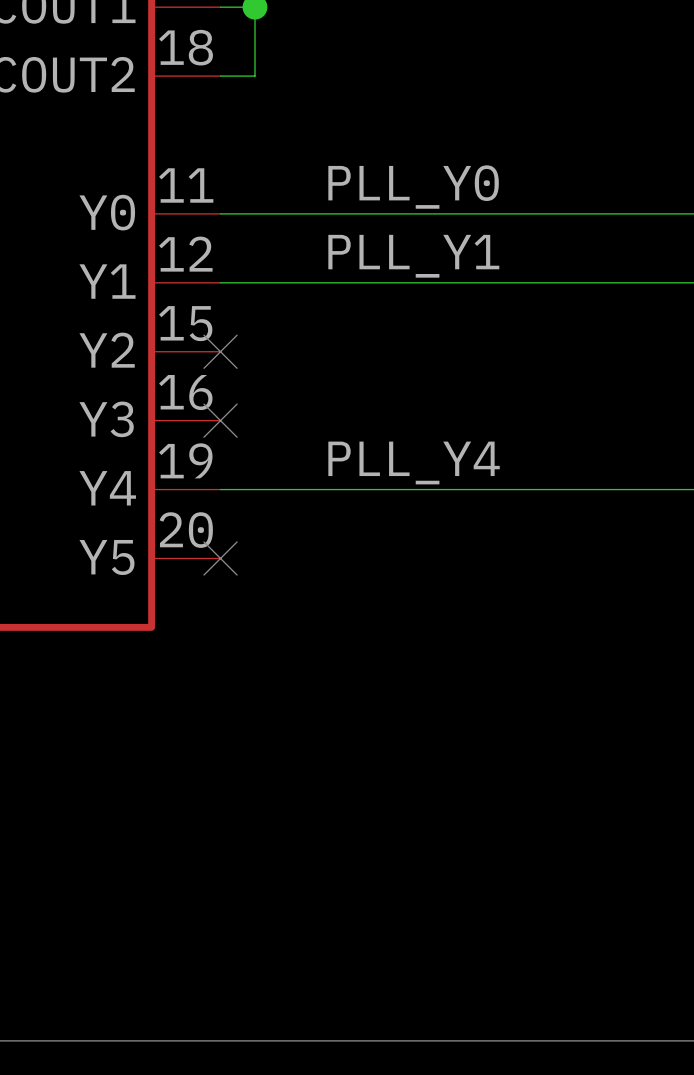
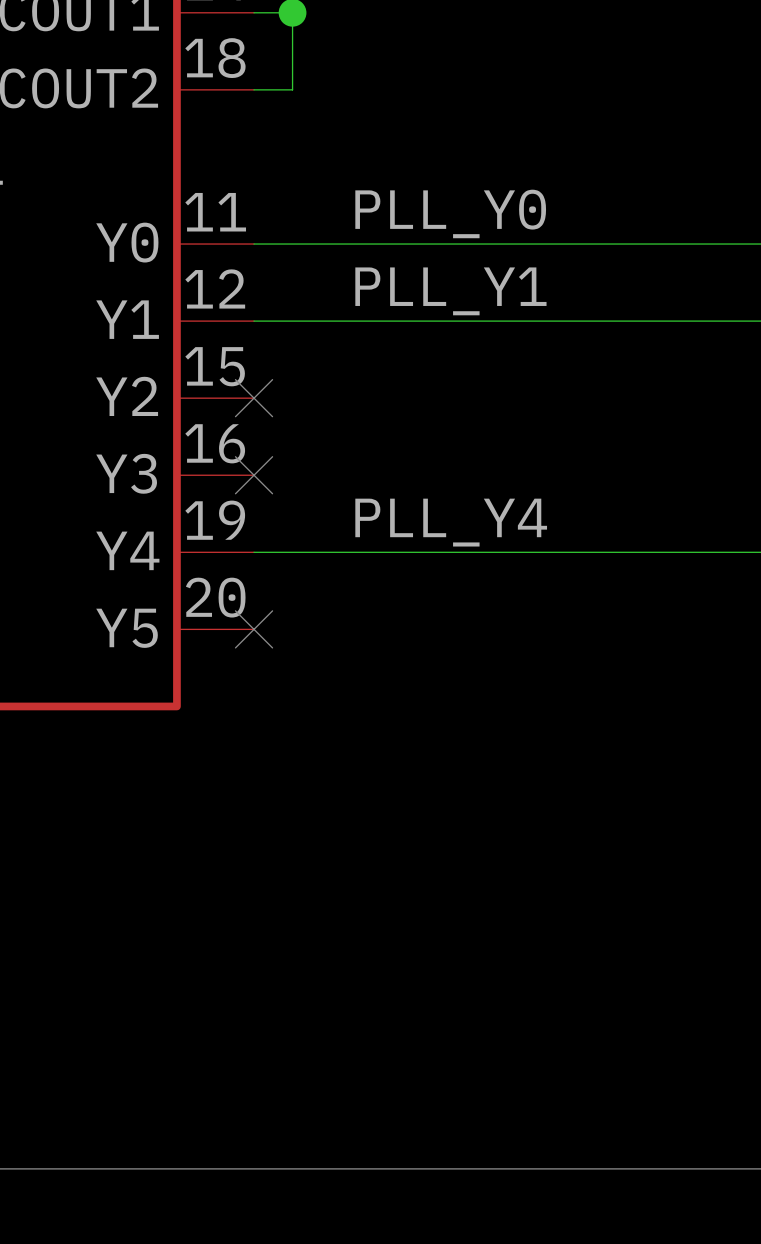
label position: PLL_Y0 (413, 187) -> PLL_Y0 (450, 213)
label position: PLL_Y1 (413, 256) -> PLL_Y1 (450, 291)
label position: PLL_Y4 (414, 462) -> PLL_Y4 (451, 522)

